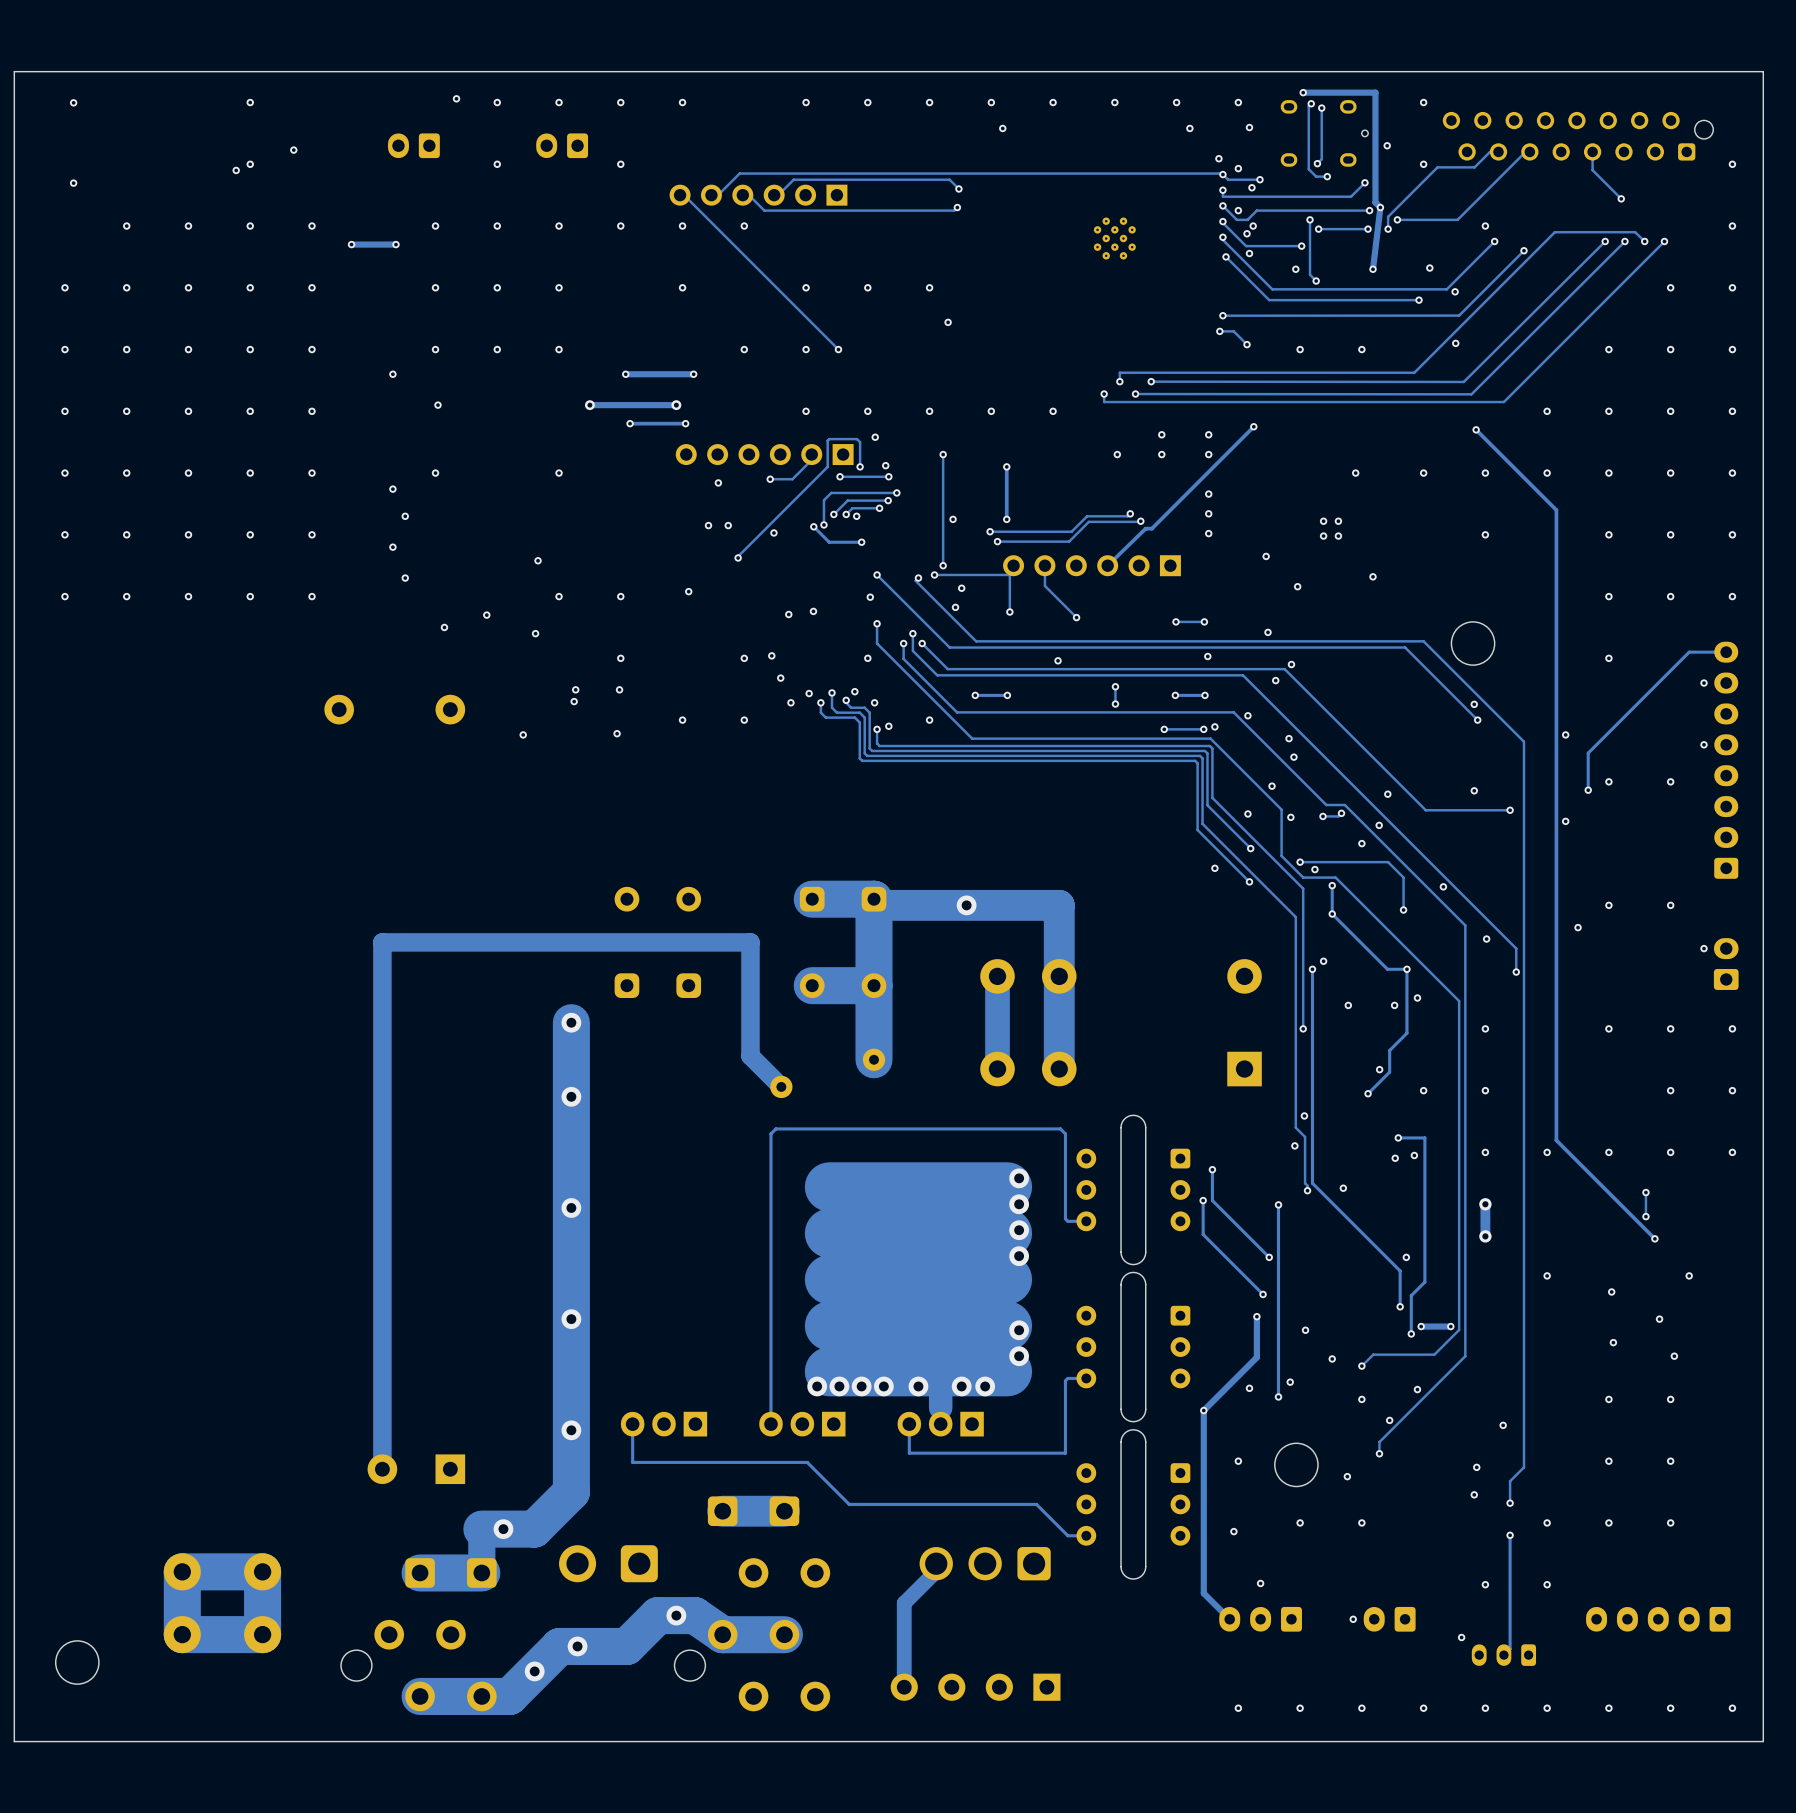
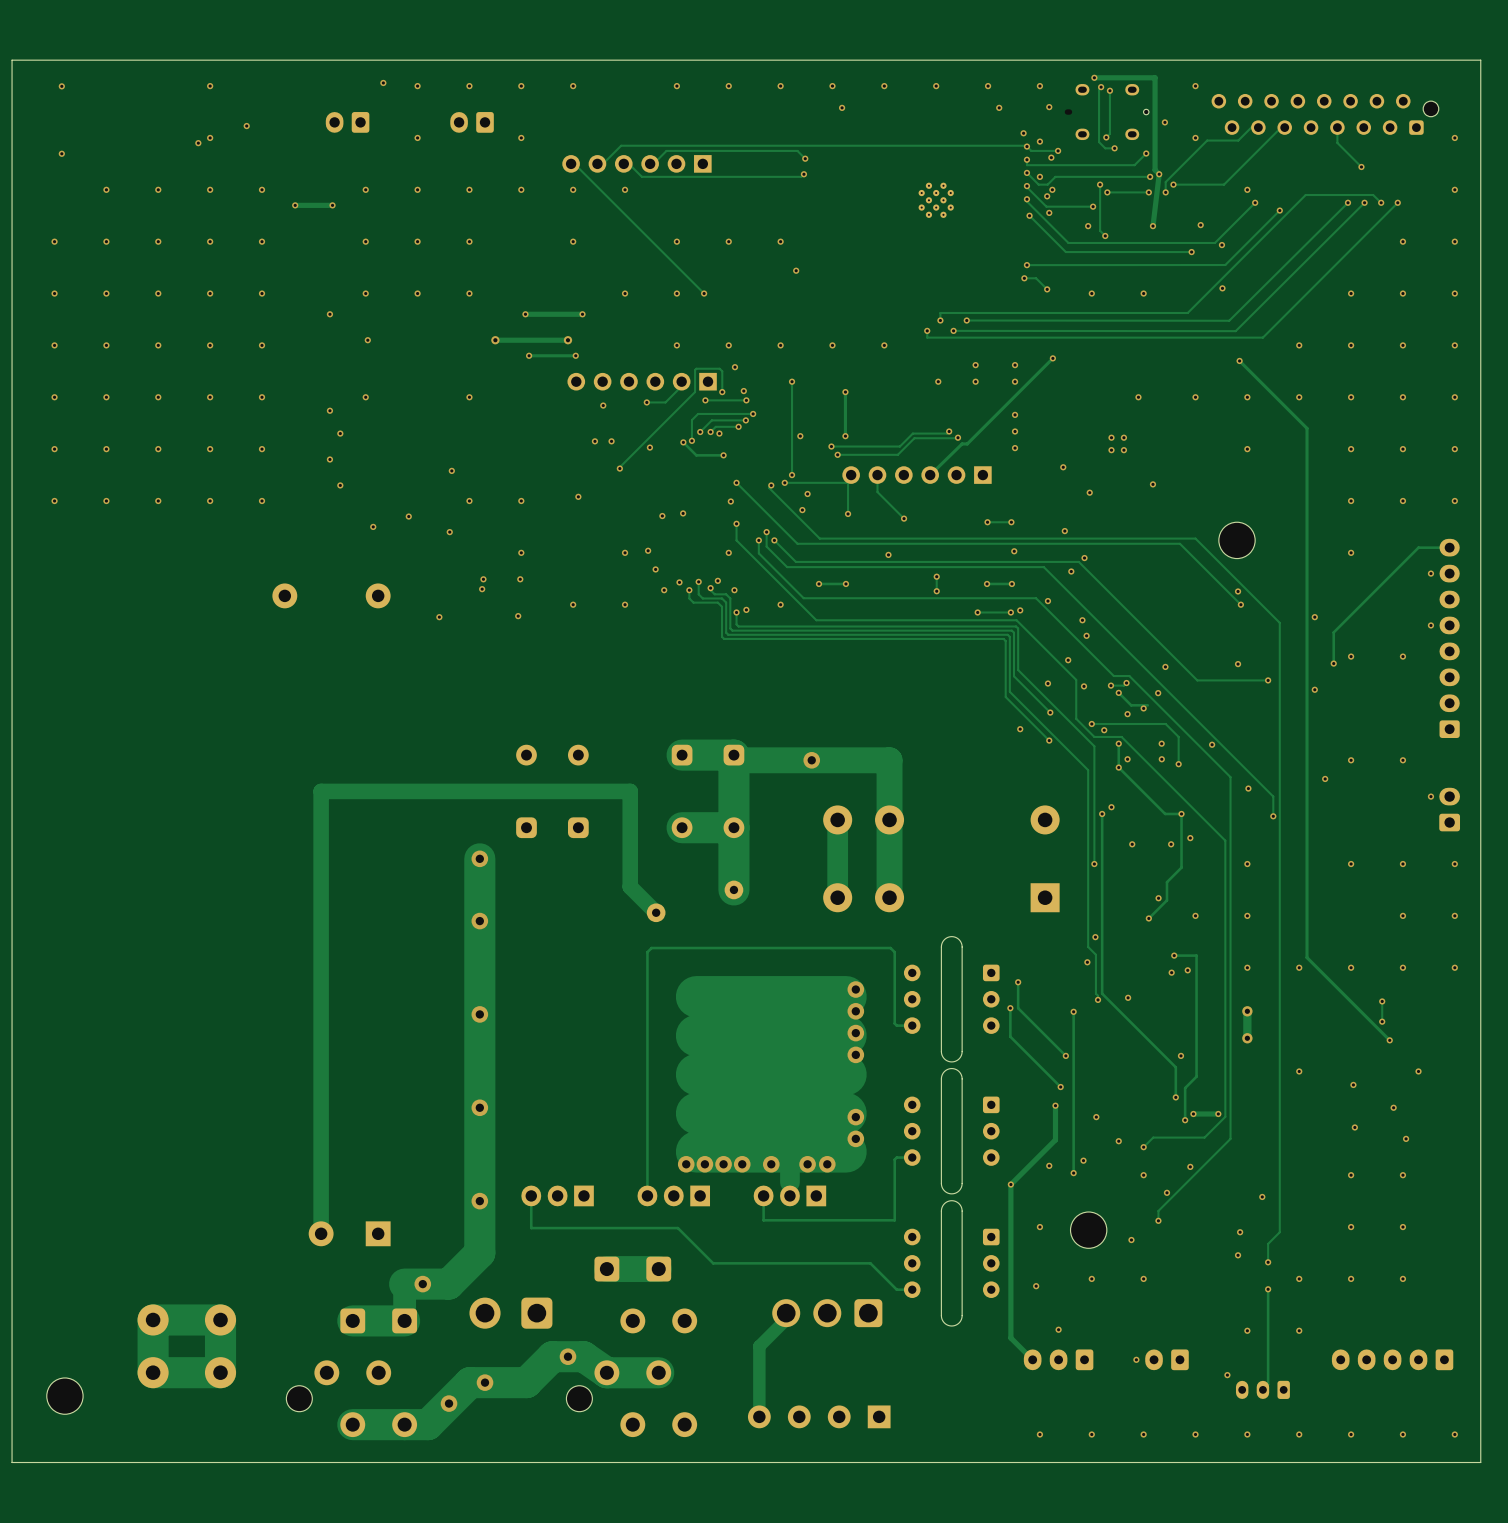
track: none -> (1118, 692) (1131, 705) (1147, 705)
via: none -> (1118, 692)
via: none -> (1127, 714)
via: none -> (1161, 743)
via: none -> (1127, 759)
via: none -> (1161, 759)

